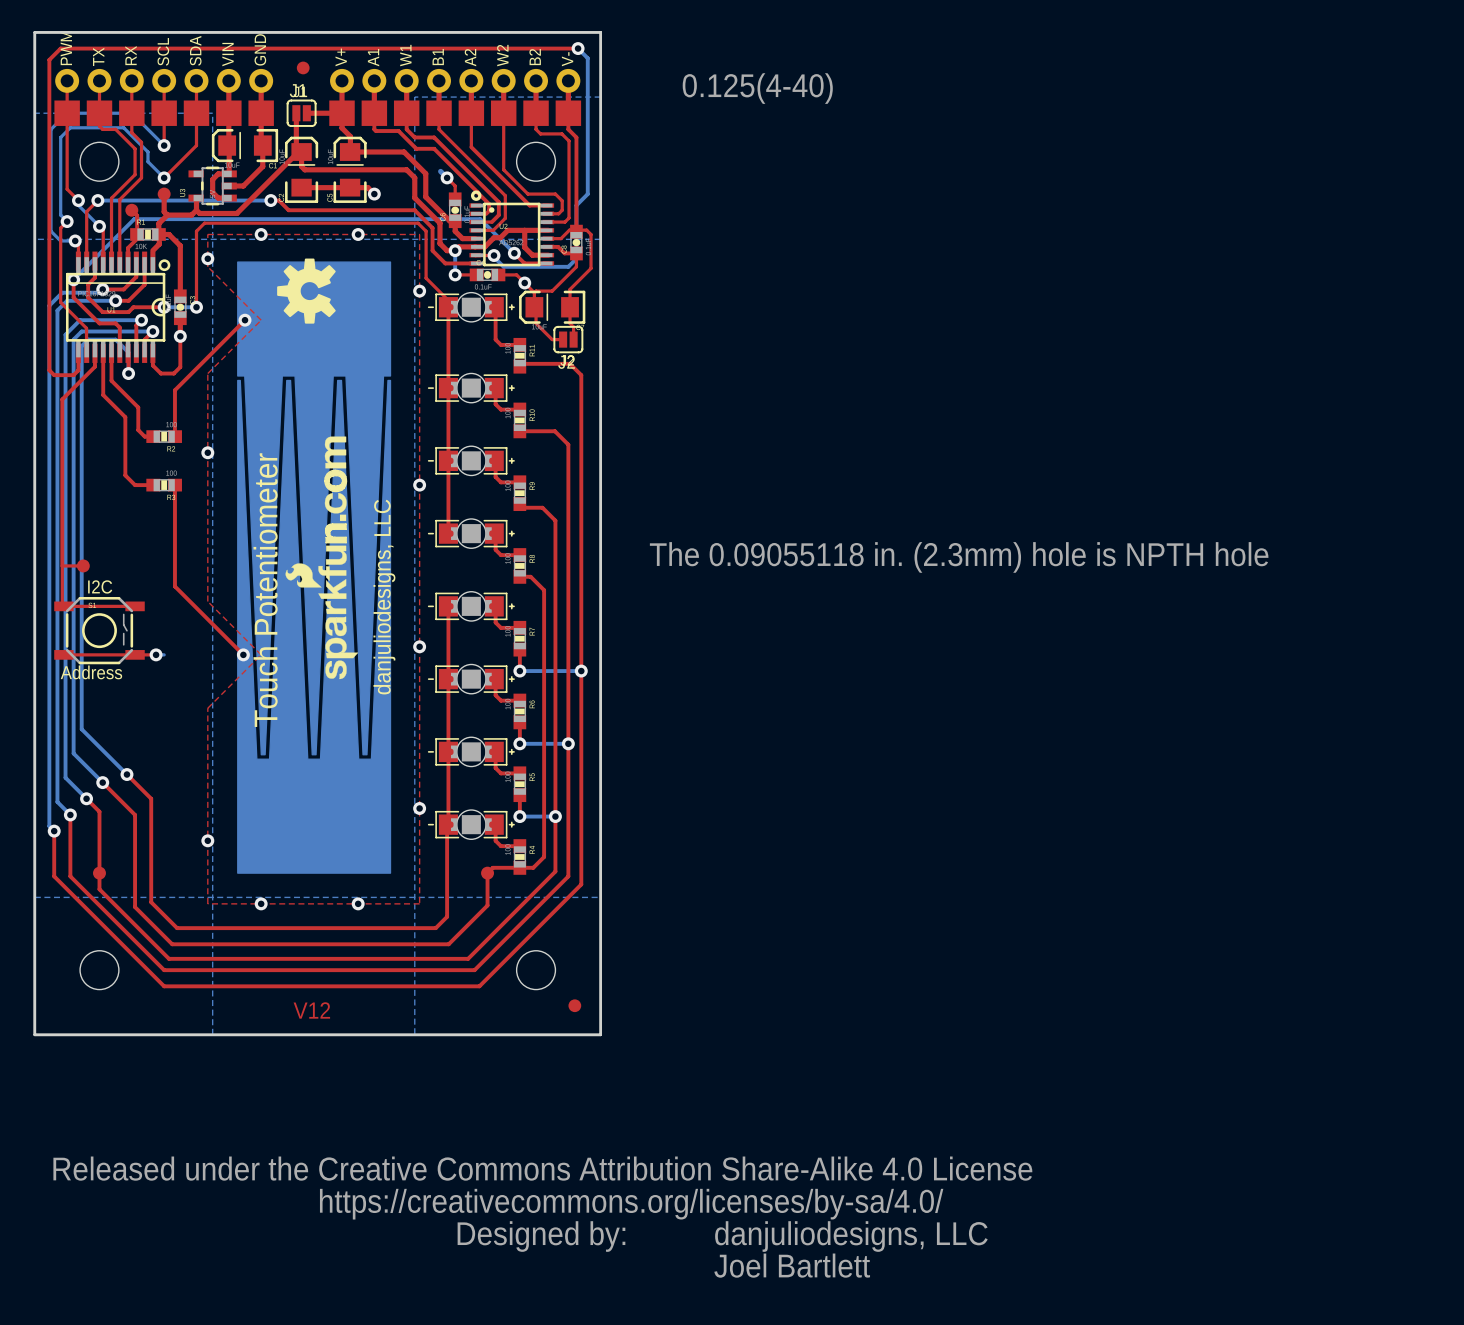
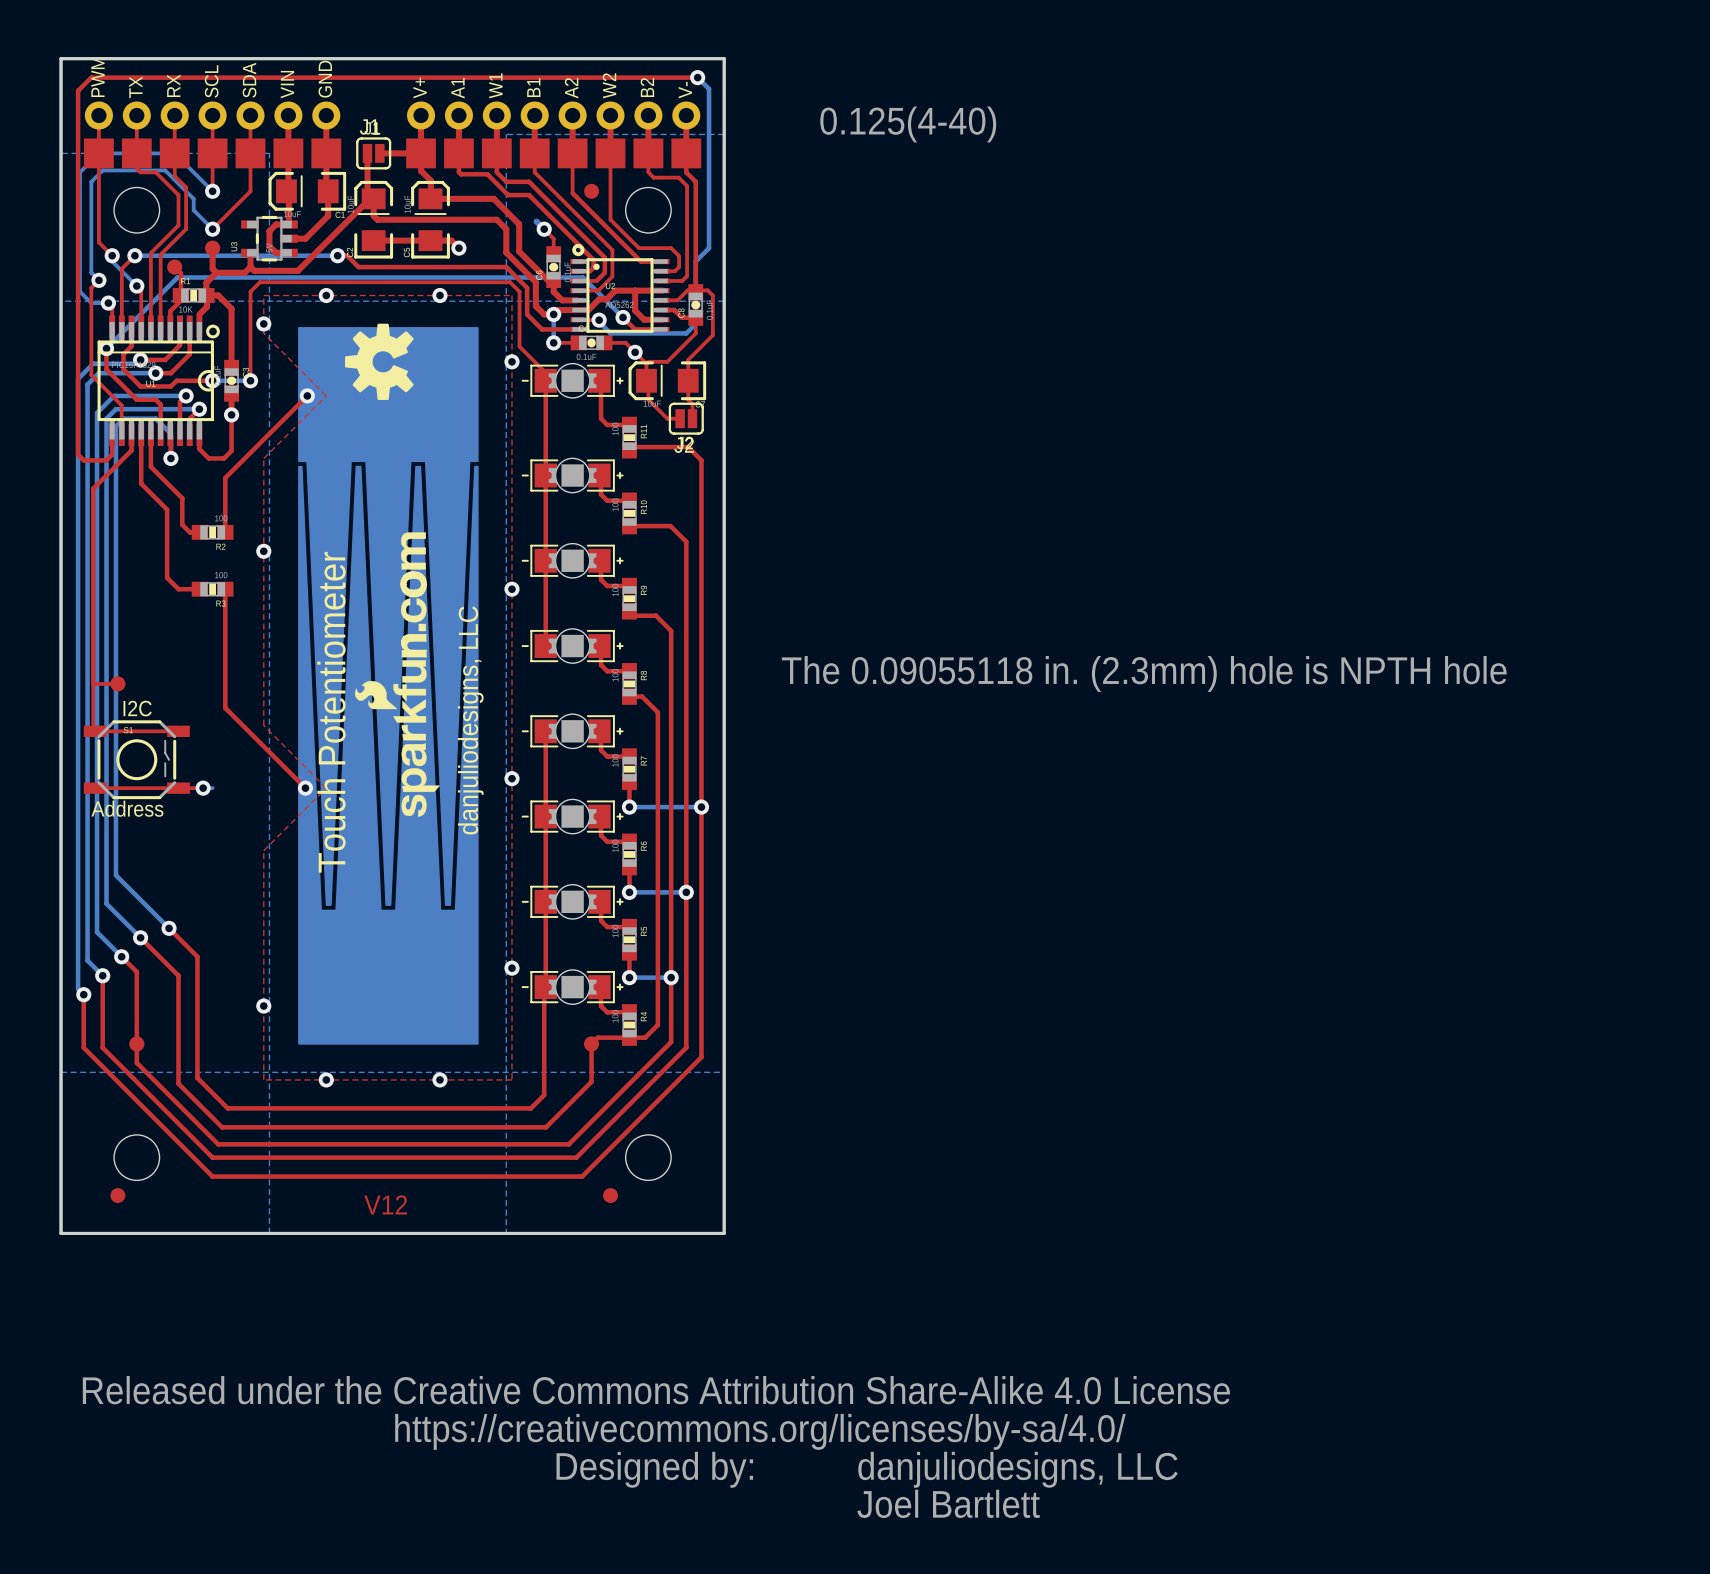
part position: (303, 67) -> (591, 191)
part: none -> (117, 1195)
part position: (574, 1005) -> (610, 1195)

